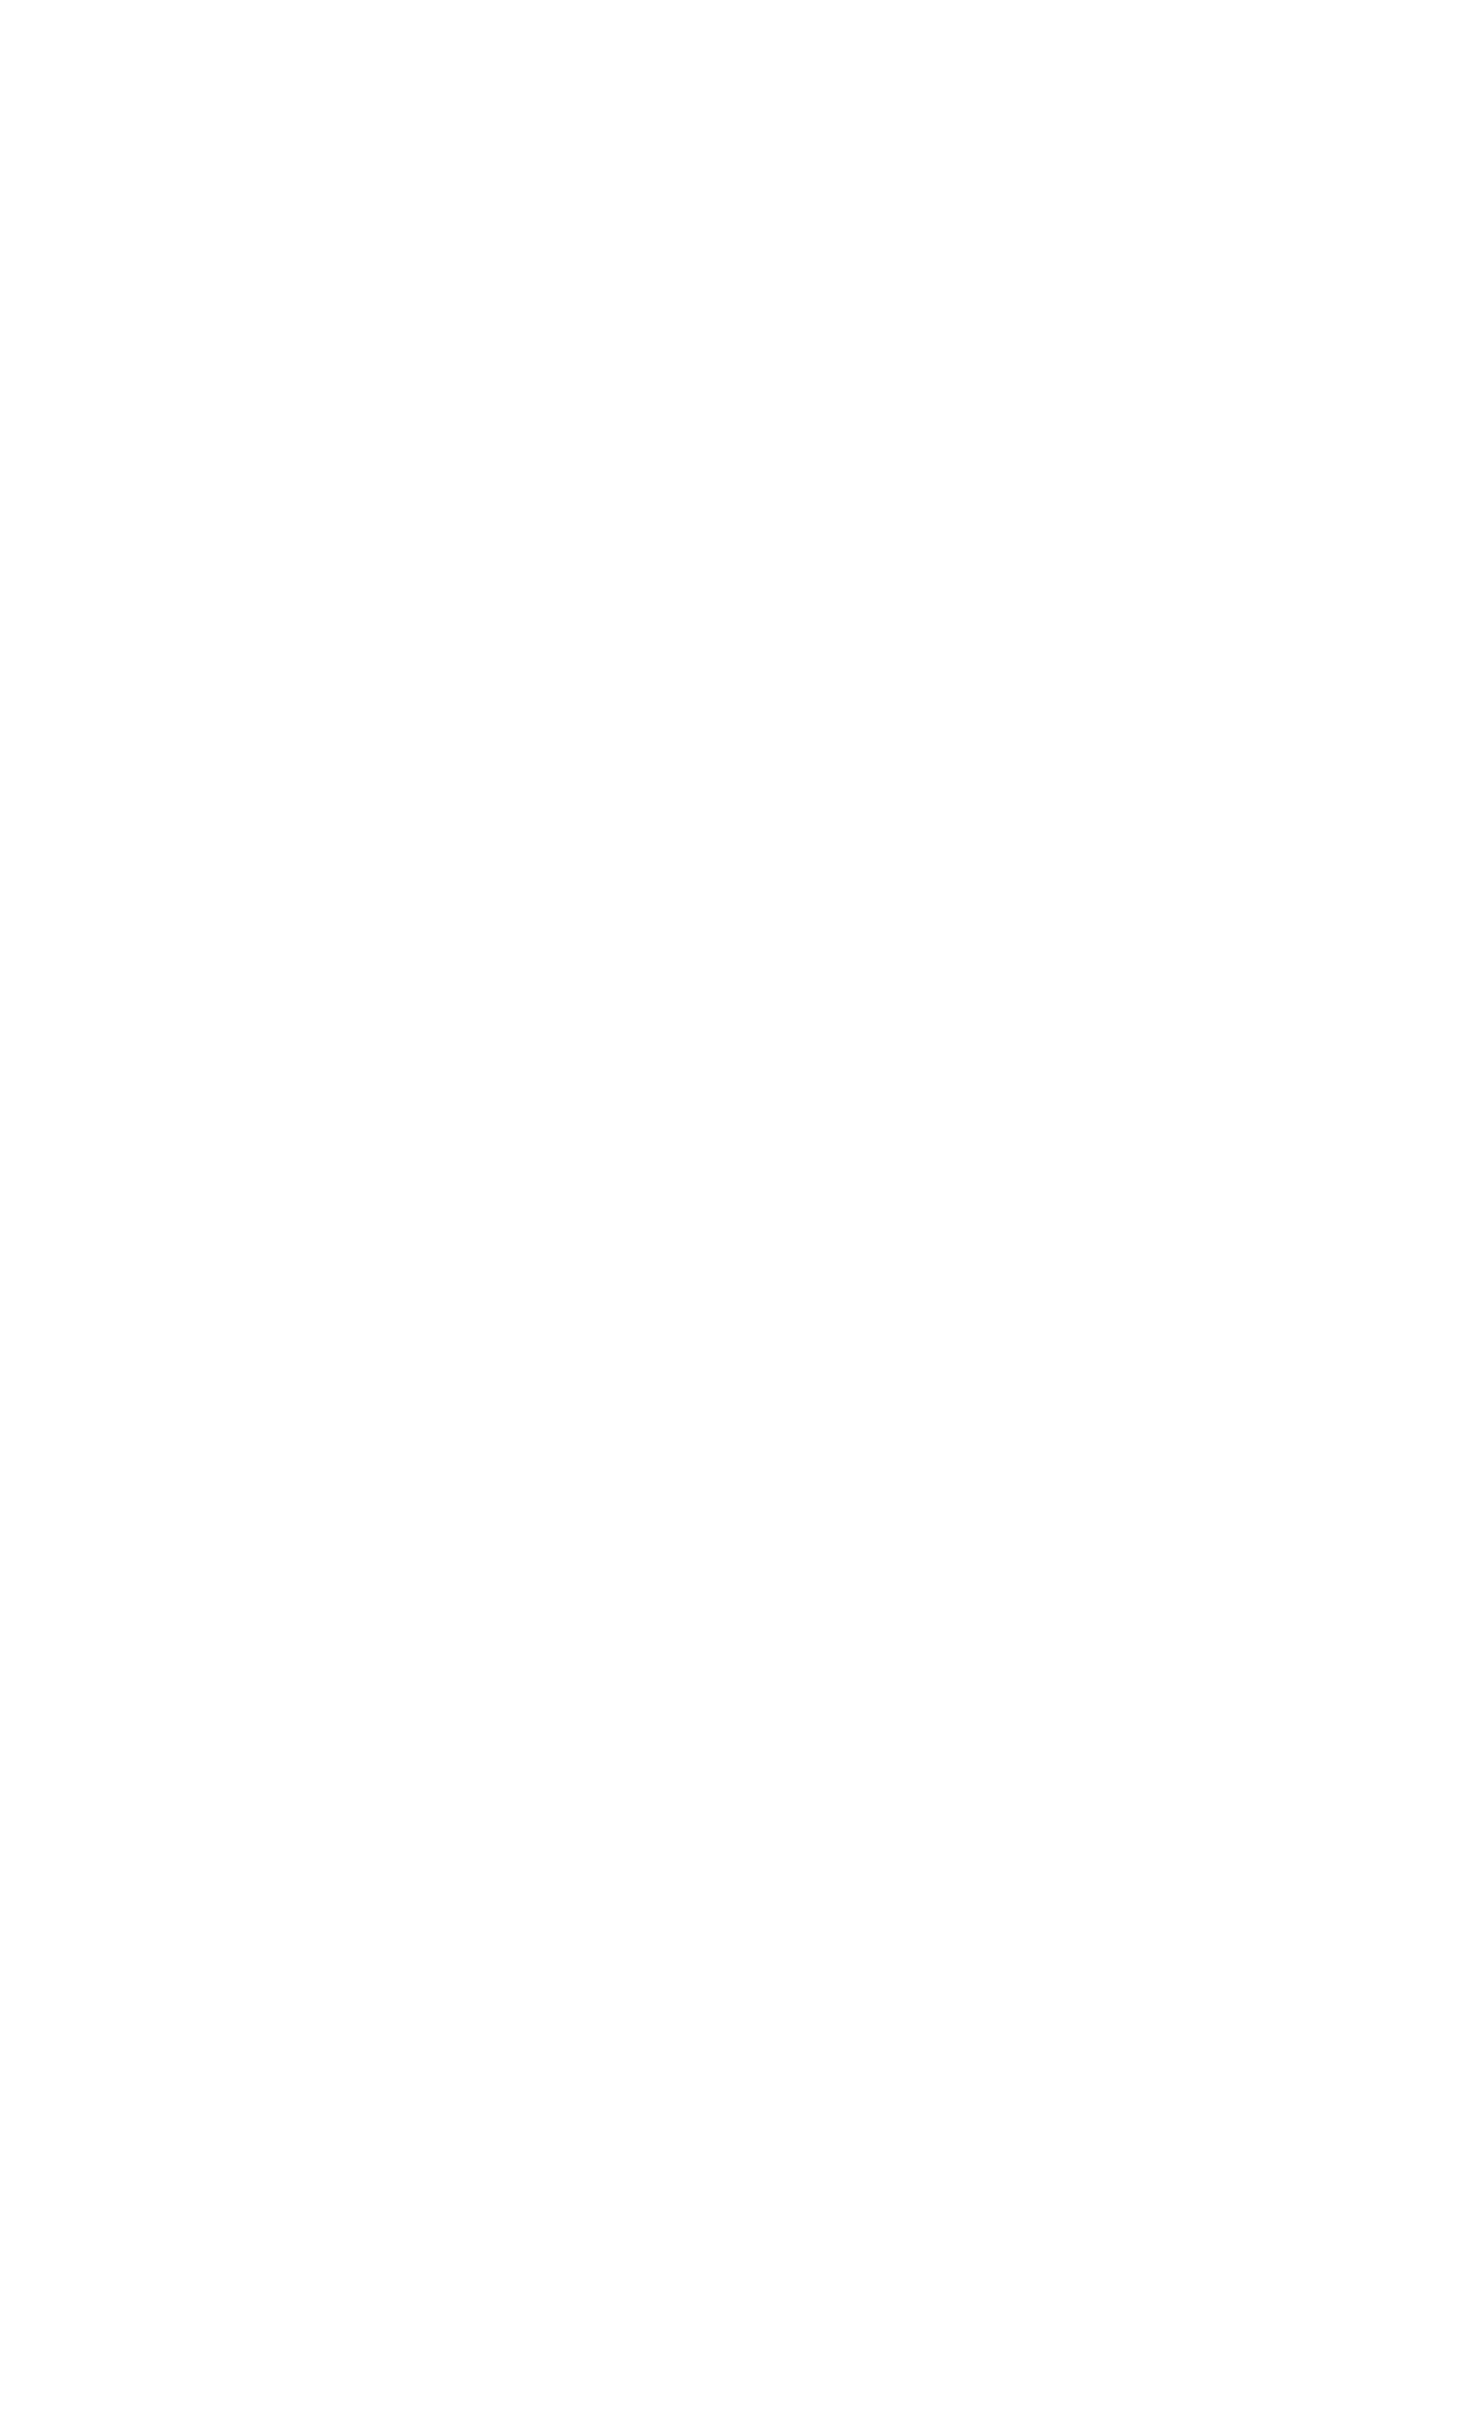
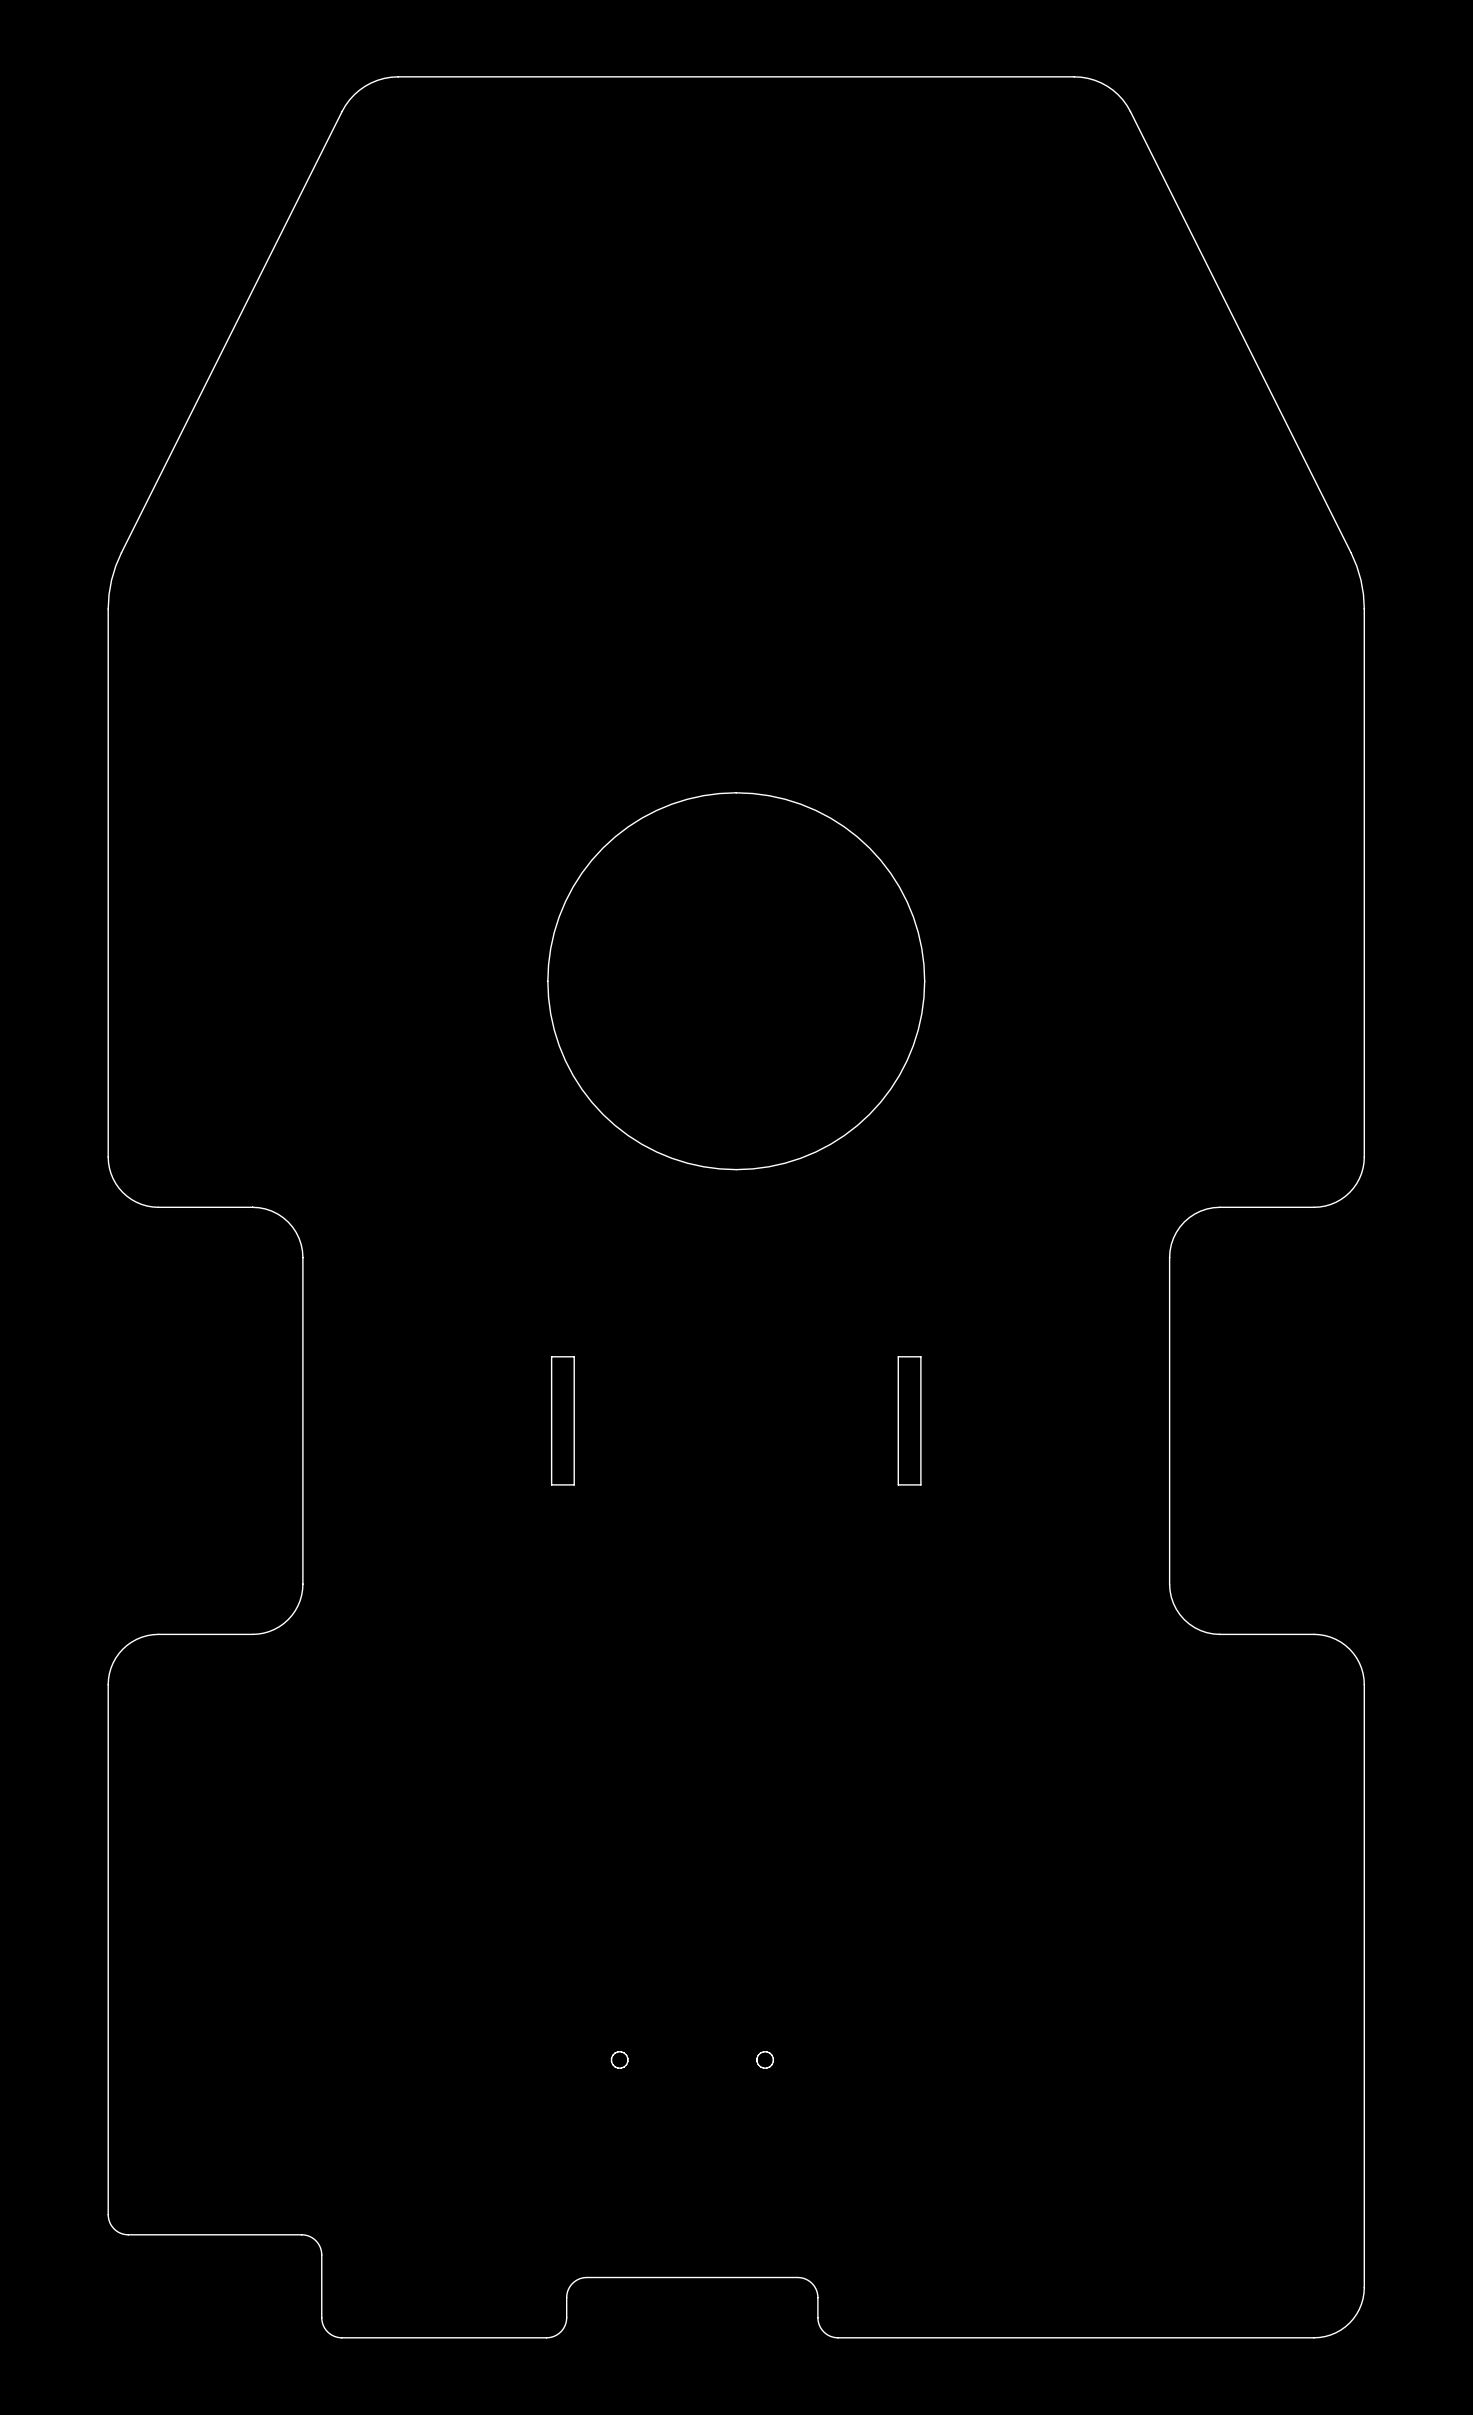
board edge: none -> (1074, 76) (398, 76) (384, 78) (371, 82) (354, 94) (342, 111) (115, 566) (111, 580) (108, 608) (109, 1168) (113, 1178) (122, 1192) (141, 1204) (158, 1207) (252, 1207) (265, 1209) (277, 1214) (288, 1222) (299, 1238) (302, 1257) (302, 1584) (301, 1595) (295, 1610) (288, 1619) (274, 1629) (252, 1634) (147, 1635) (136, 1639) (122, 1649) (111, 1668) (108, 1684) (108, 2217) (114, 2228) (125, 2234) (301, 2234) (311, 2237) (319, 2244) (321, 2252) (322, 2322) (327, 2331) (336, 2337) (551, 2337) (558, 2333) (565, 2325) (566, 2294) (569, 2287) (576, 2280) (586, 2277) (803, 2278) (810, 2281) (816, 2289) (818, 2320) (820, 2327) (827, 2335) (838, 2337) (1319, 2337) (1335, 2332) (1345, 2326) (1356, 2314) (1361, 2304) (1364, 2287) (1363, 1673) (1356, 1657) (1349, 1649) (1330, 1637) (1314, 1634) (1219, 1634) (1206, 1632) (1194, 1627) (1184, 1619) (1173, 1603) (1169, 1584) (1169, 1257) (1171, 1244) (1176, 1232) (1184, 1222) (1200, 1211) (1219, 1207) (1325, 1206) (1340, 1199) (1349, 1192) (1361, 1173) (1364, 1157) (1363, 594) (1356, 566) (1351, 552) (1130, 111) (1118, 94) (1107, 86) (1088, 78) (1074, 76)
board edge: none -> (736, 792) (768, 795) (800, 804) (844, 826) (869, 847) (890, 873) (907, 901) (921, 948) (924, 981) (918, 1029) (907, 1060) (890, 1089) (869, 1114) (844, 1135) (815, 1151) (785, 1163) (736, 1169) (687, 1163) (656, 1151) (628, 1135) (603, 1114) (581, 1089) (565, 1060) (550, 1013) (547, 981) (550, 948) (559, 916) (581, 873) (603, 847) (628, 826) (671, 804) (703, 795) (736, 792)
board edge: none -> (574, 1356) (551, 1356) (551, 1484) (574, 1484) (574, 1356)
board edge: none -> (920, 1356) (920, 1484) (898, 1484) (898, 1356) (920, 1356)
board edge: none -> (621, 2051) (615, 2053) (611, 2058) (612, 2064) (618, 2068) (624, 2066) (627, 2061) (626, 2055) (621, 2051)
board edge: none -> (766, 2051) (772, 2055) (773, 2061) (769, 2066) (763, 2068) (758, 2064) (756, 2058) (760, 2053) (766, 2051)

